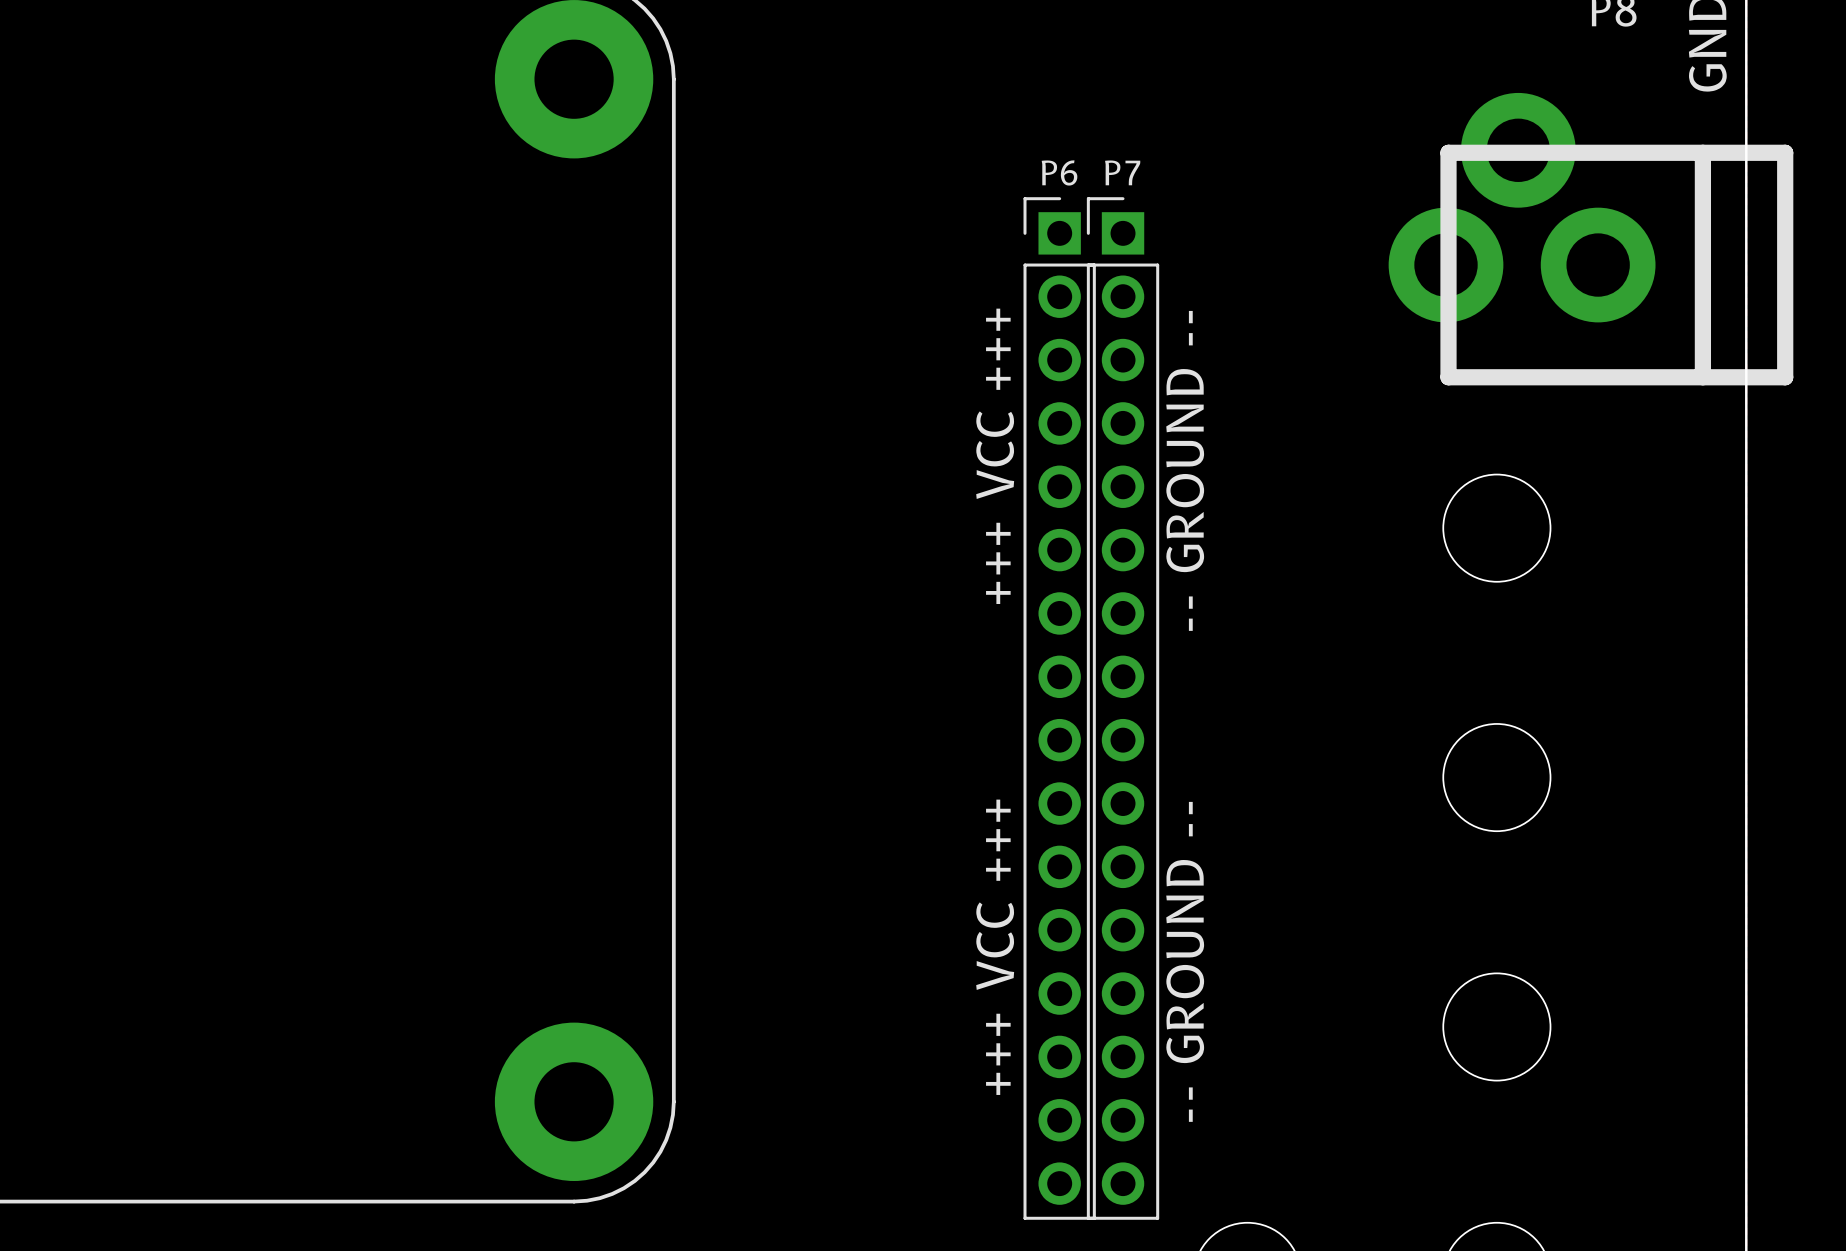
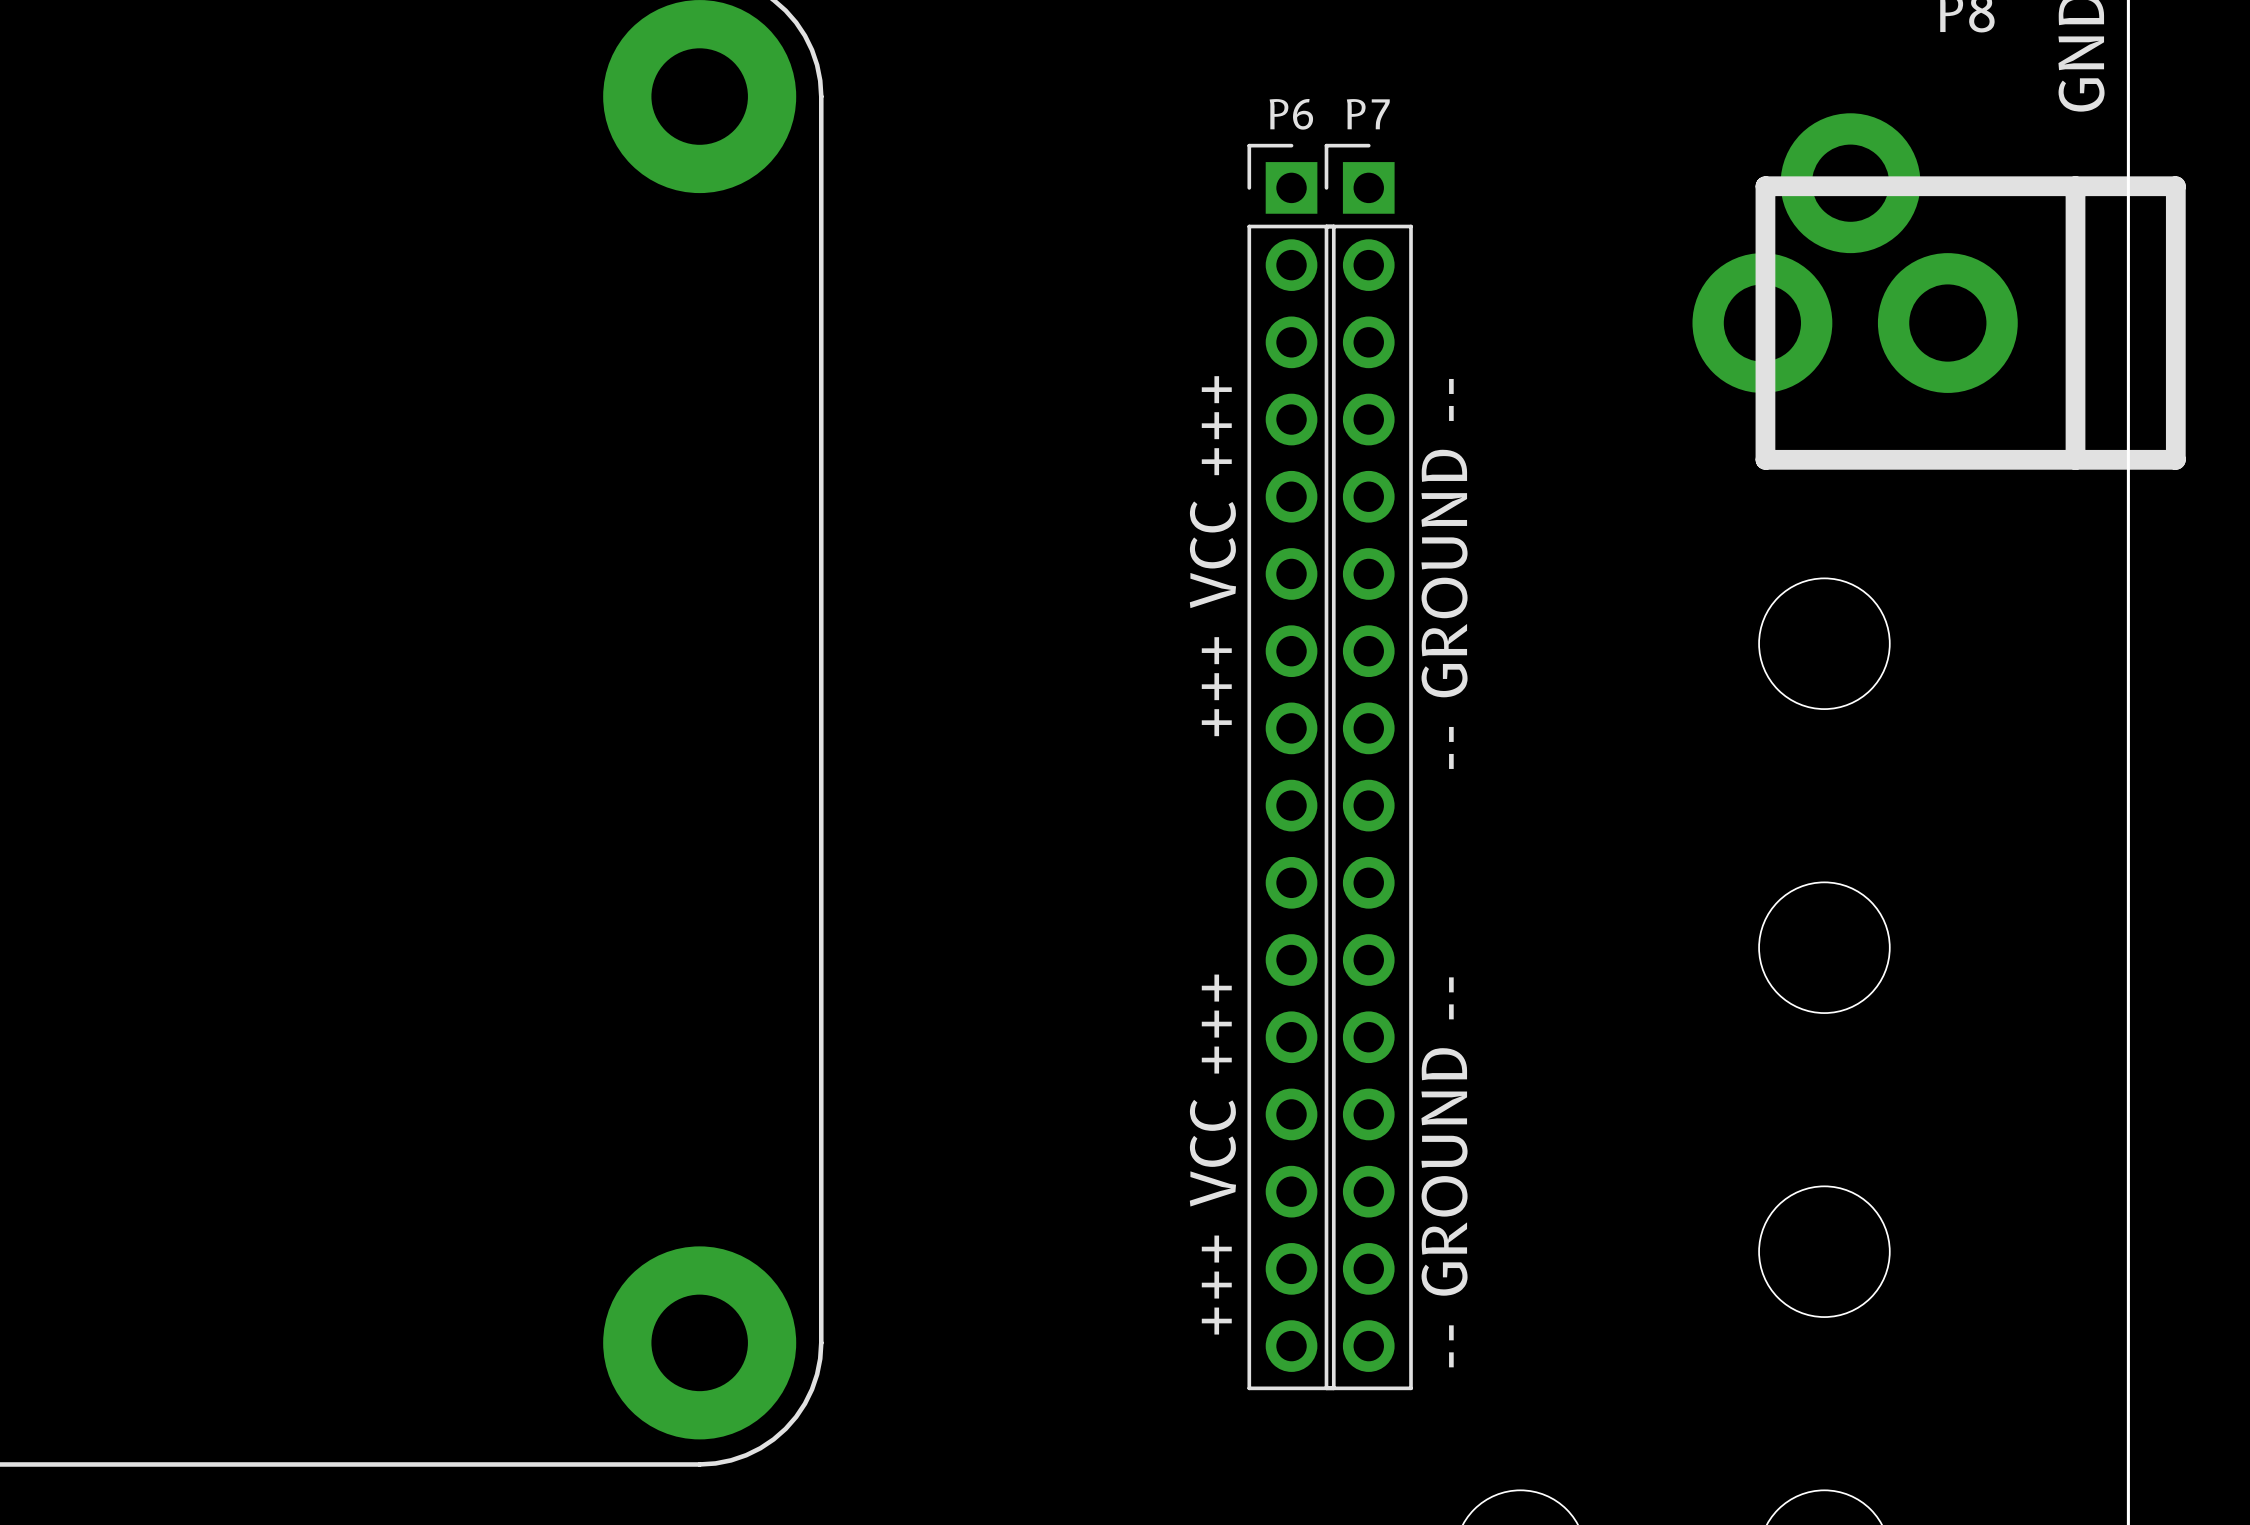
P6 position: (1059, 708) -> (1291, 766)
P7 position: (1123, 708) -> (1368, 766)

